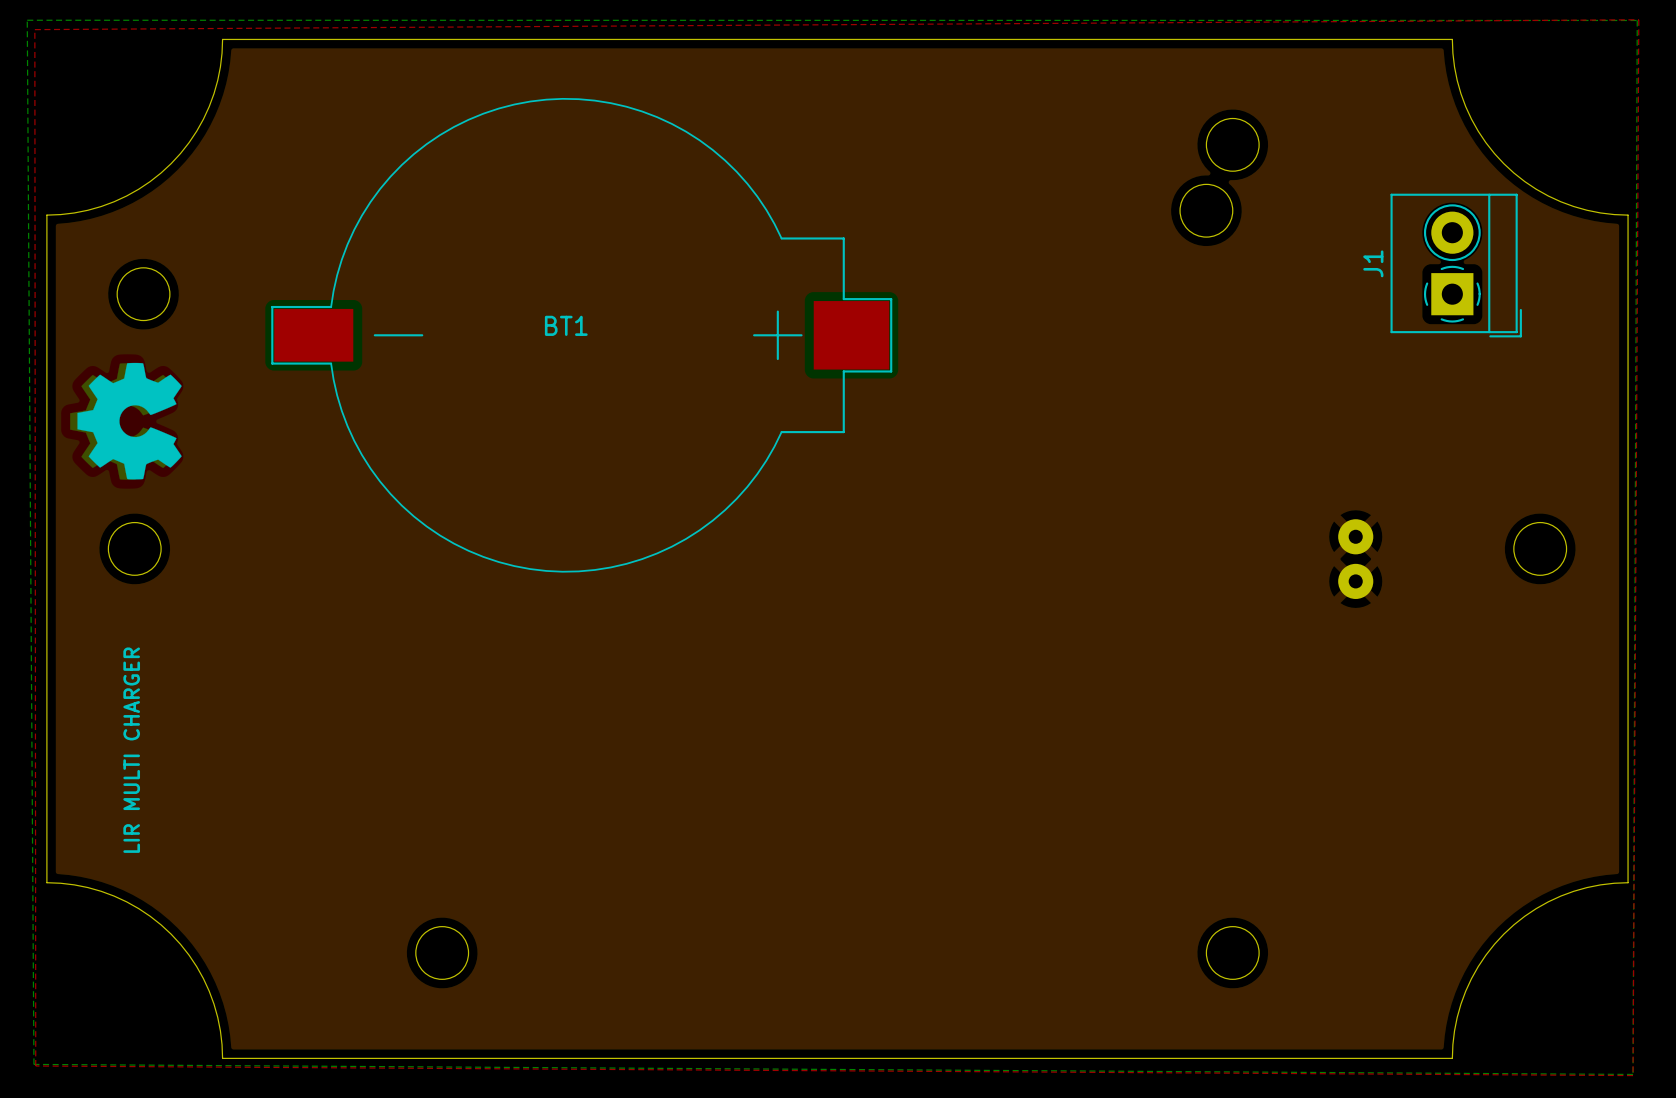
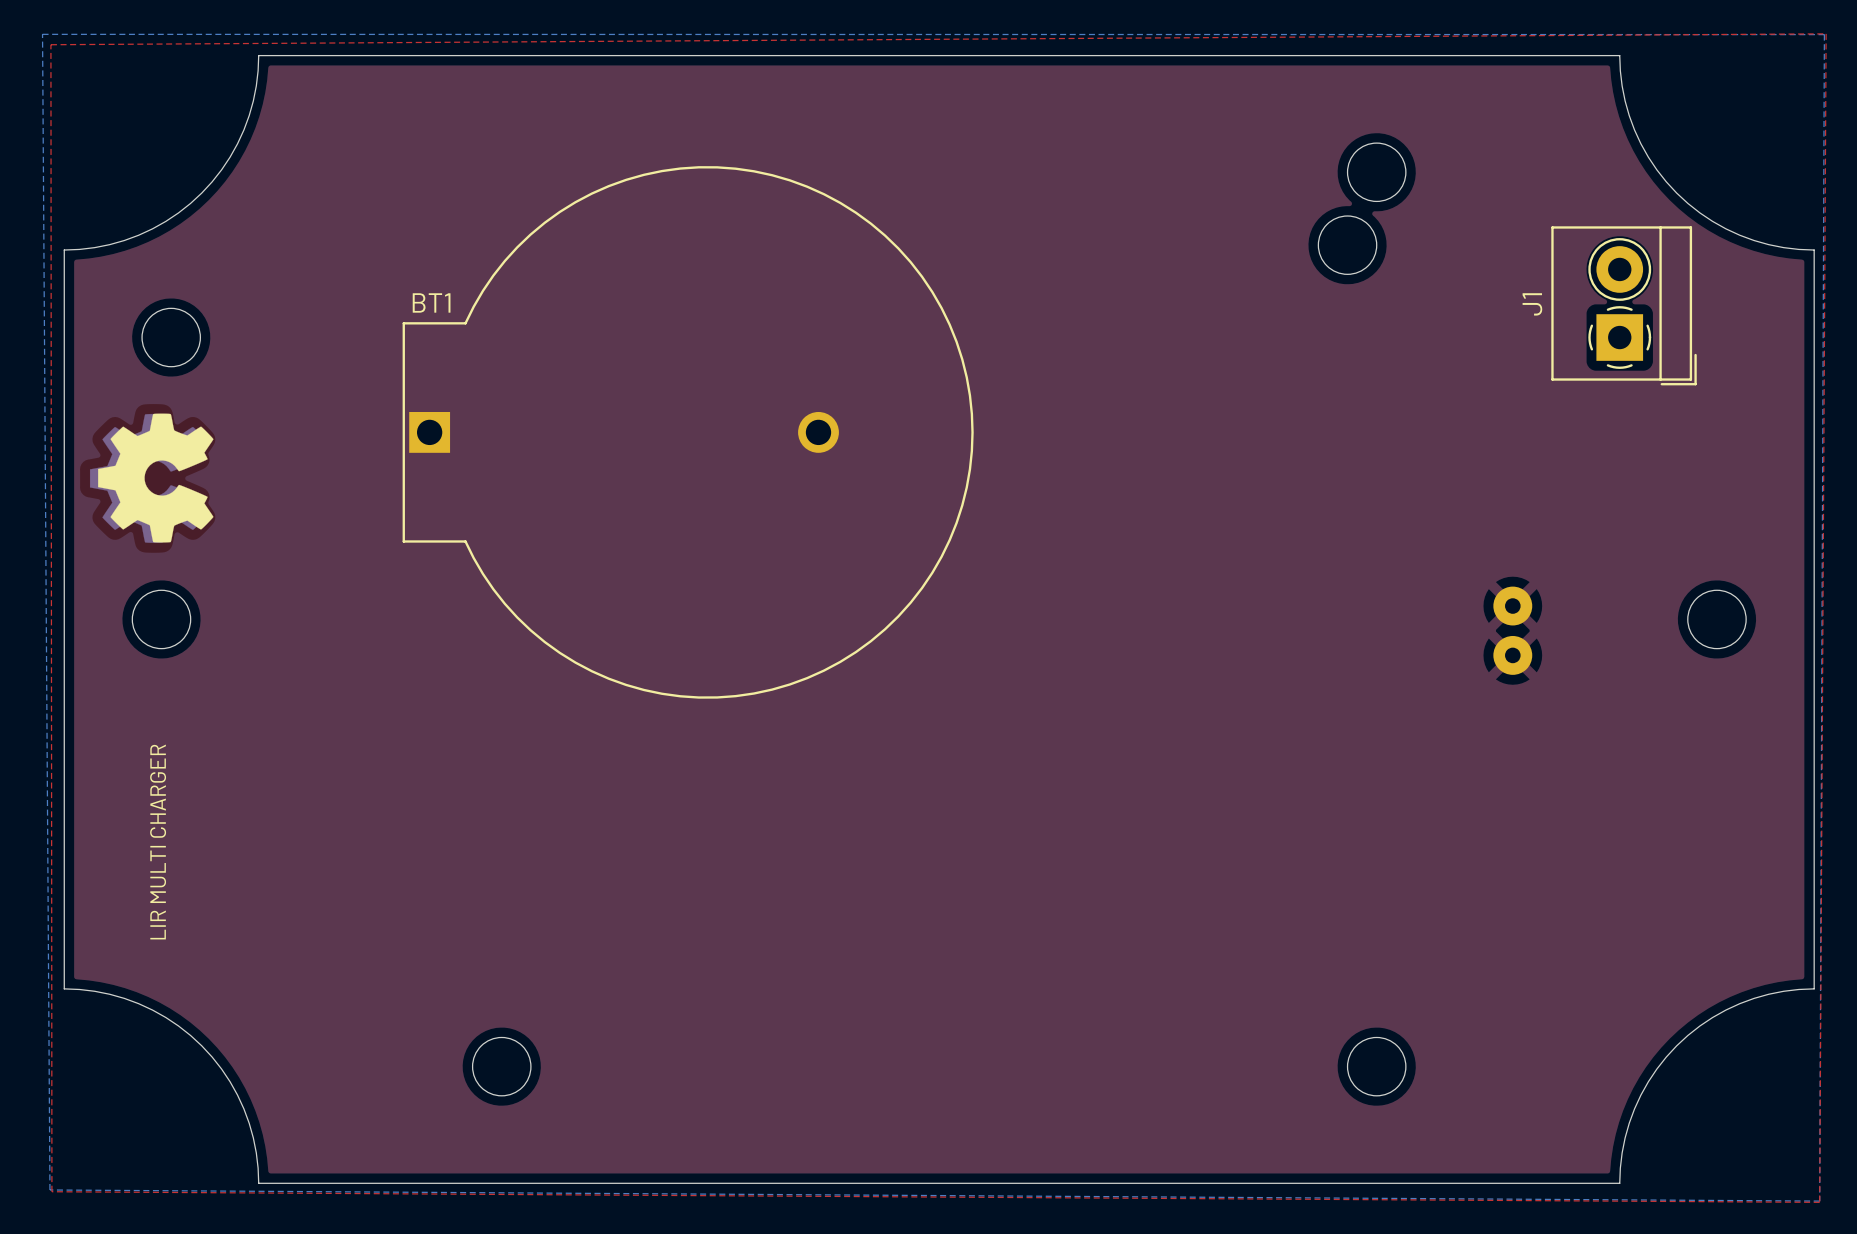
BT1 footprint: [271, 97, 893, 573] -> [402, 166, 974, 699]
BT1 name position: BT1 (566, 325) -> BT1 (431, 302)

